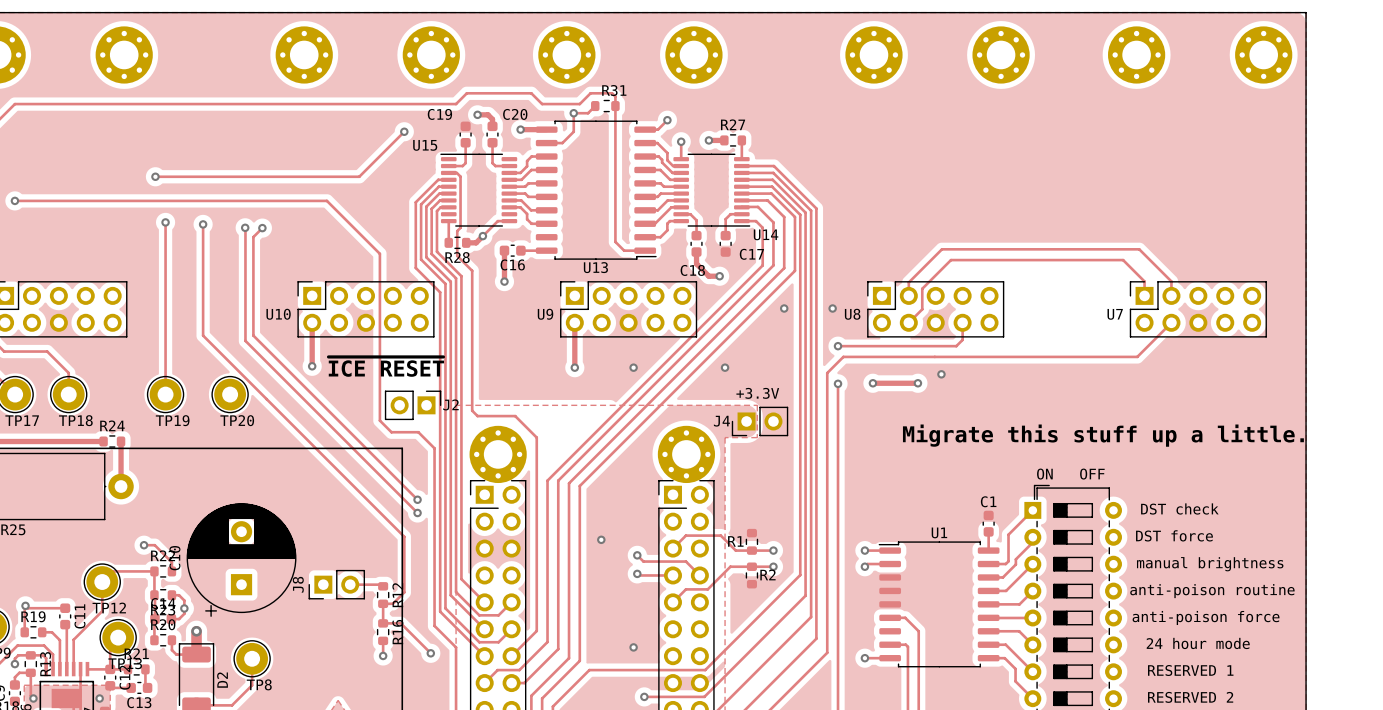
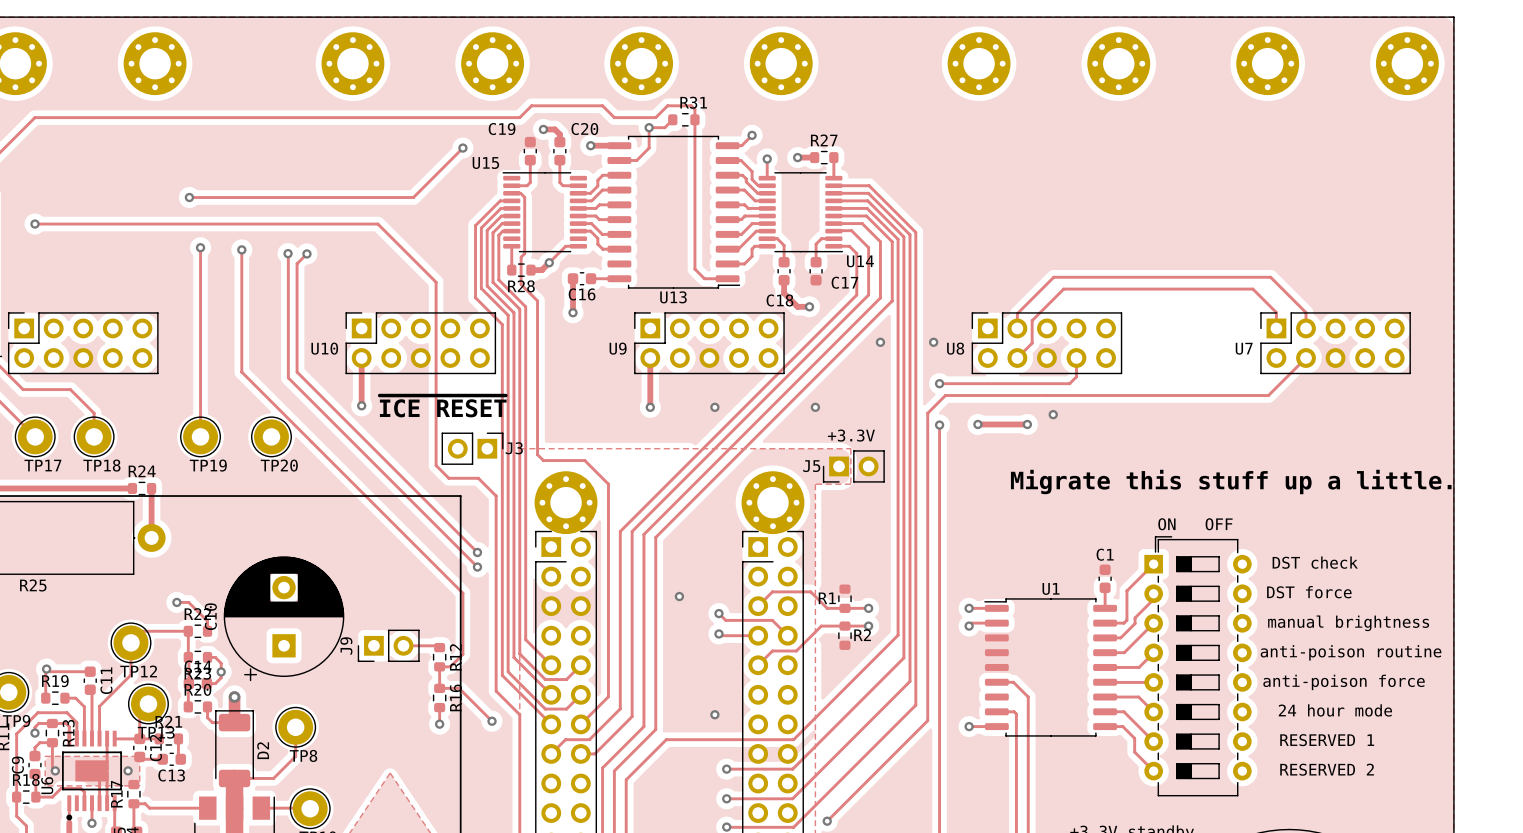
J2 name: J2 (450, 404) -> J3 (514, 448)
J4 name: J4 (721, 421) -> J5 (811, 466)
J8 name: J8 (298, 584) -> J9 (346, 645)

